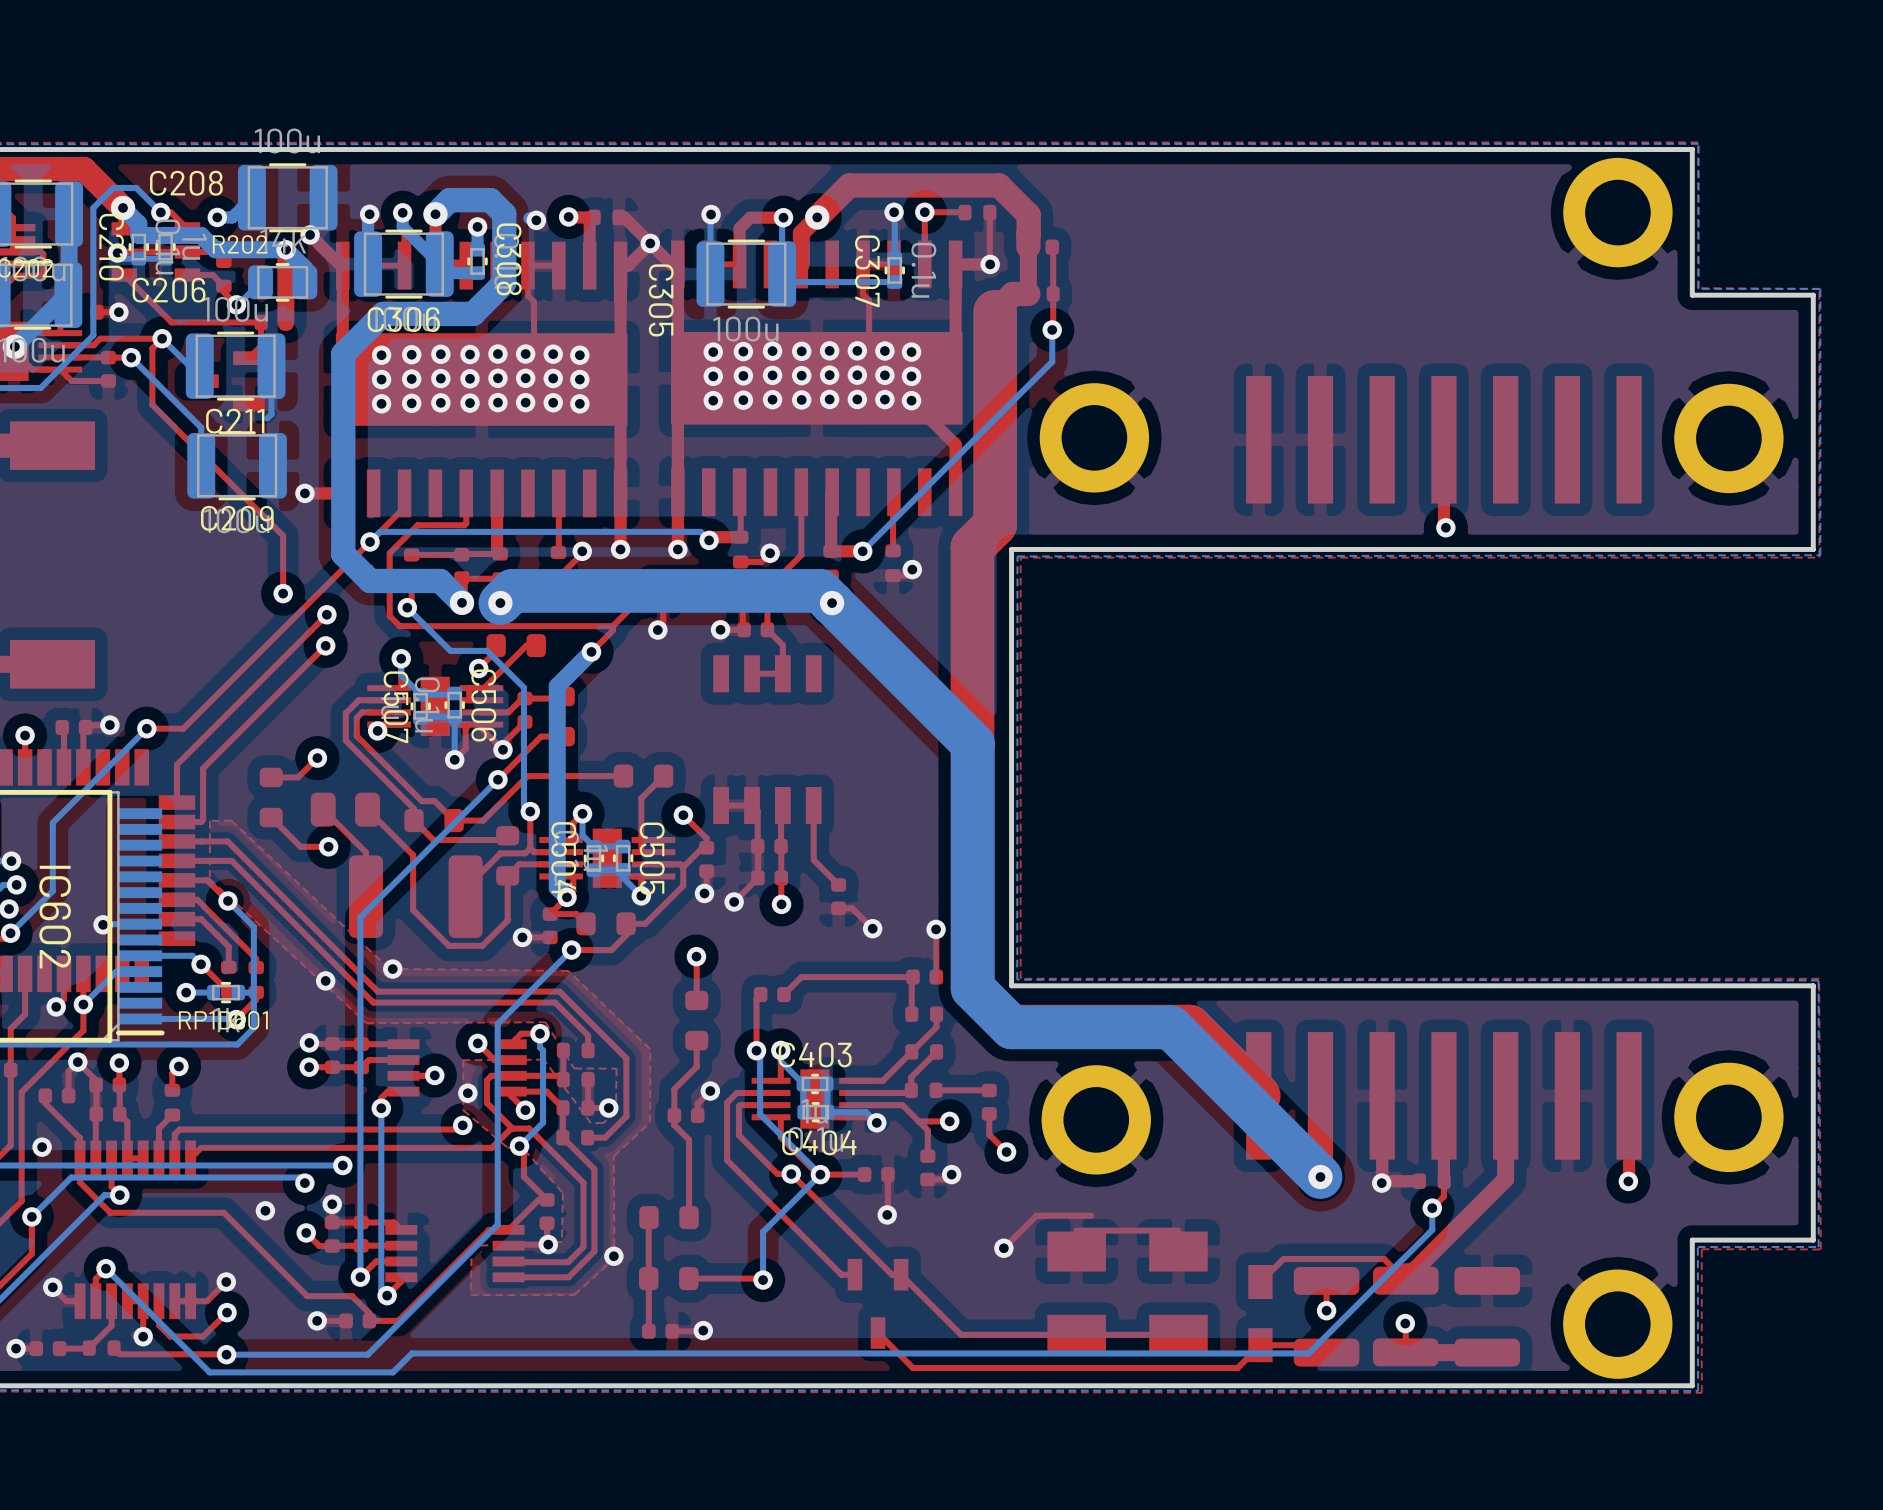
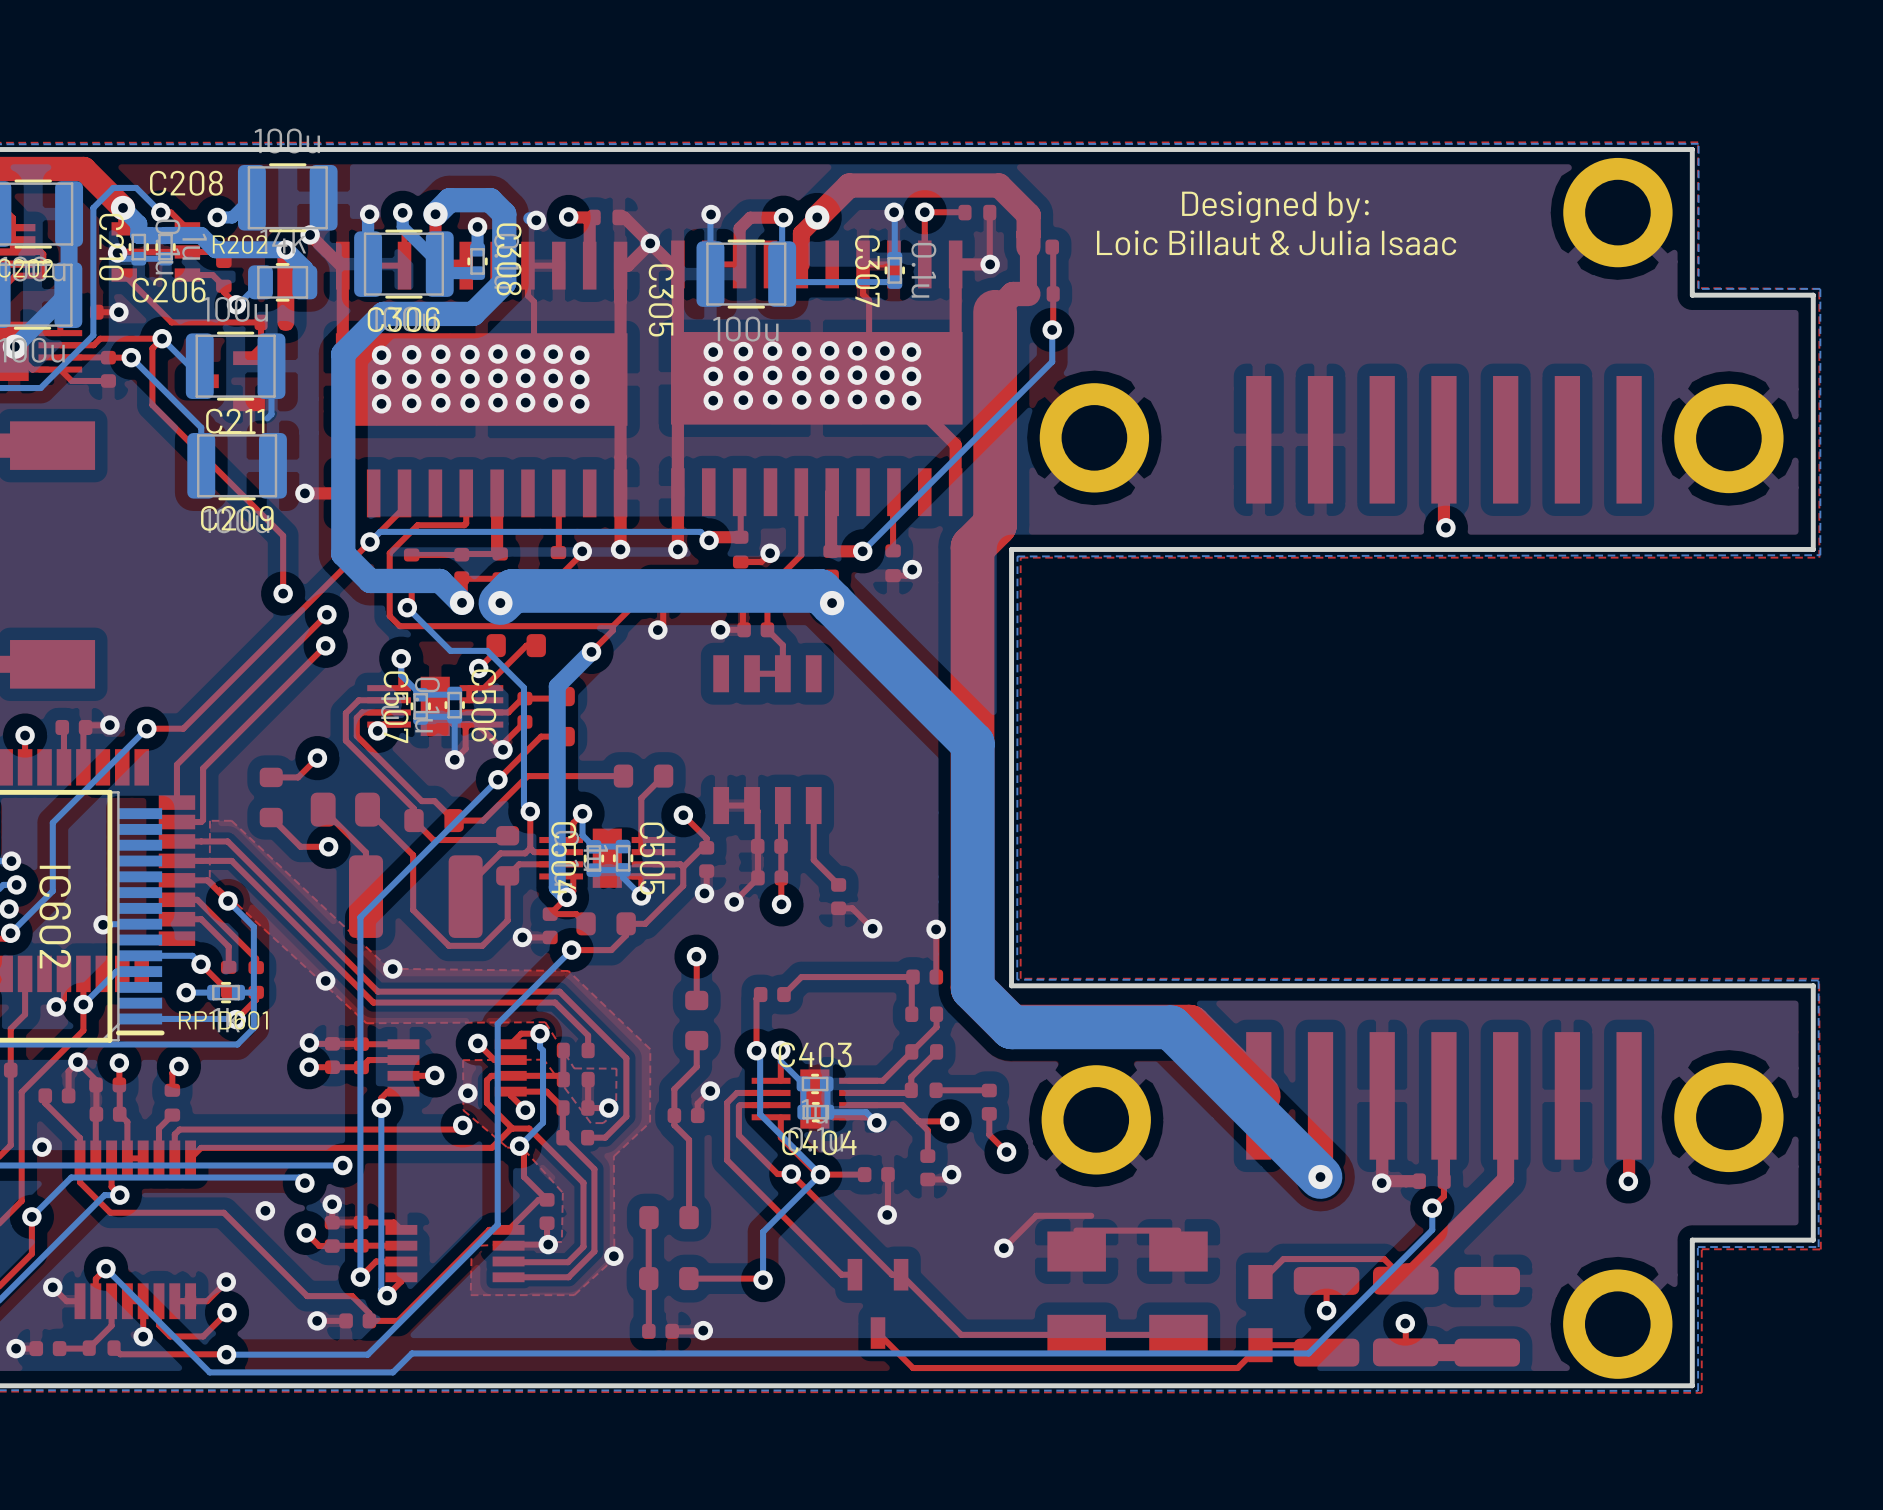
text: none -> Designed by: (1275, 207)
text: none -> Loic Billaut & Julia Isaac (1276, 242)

